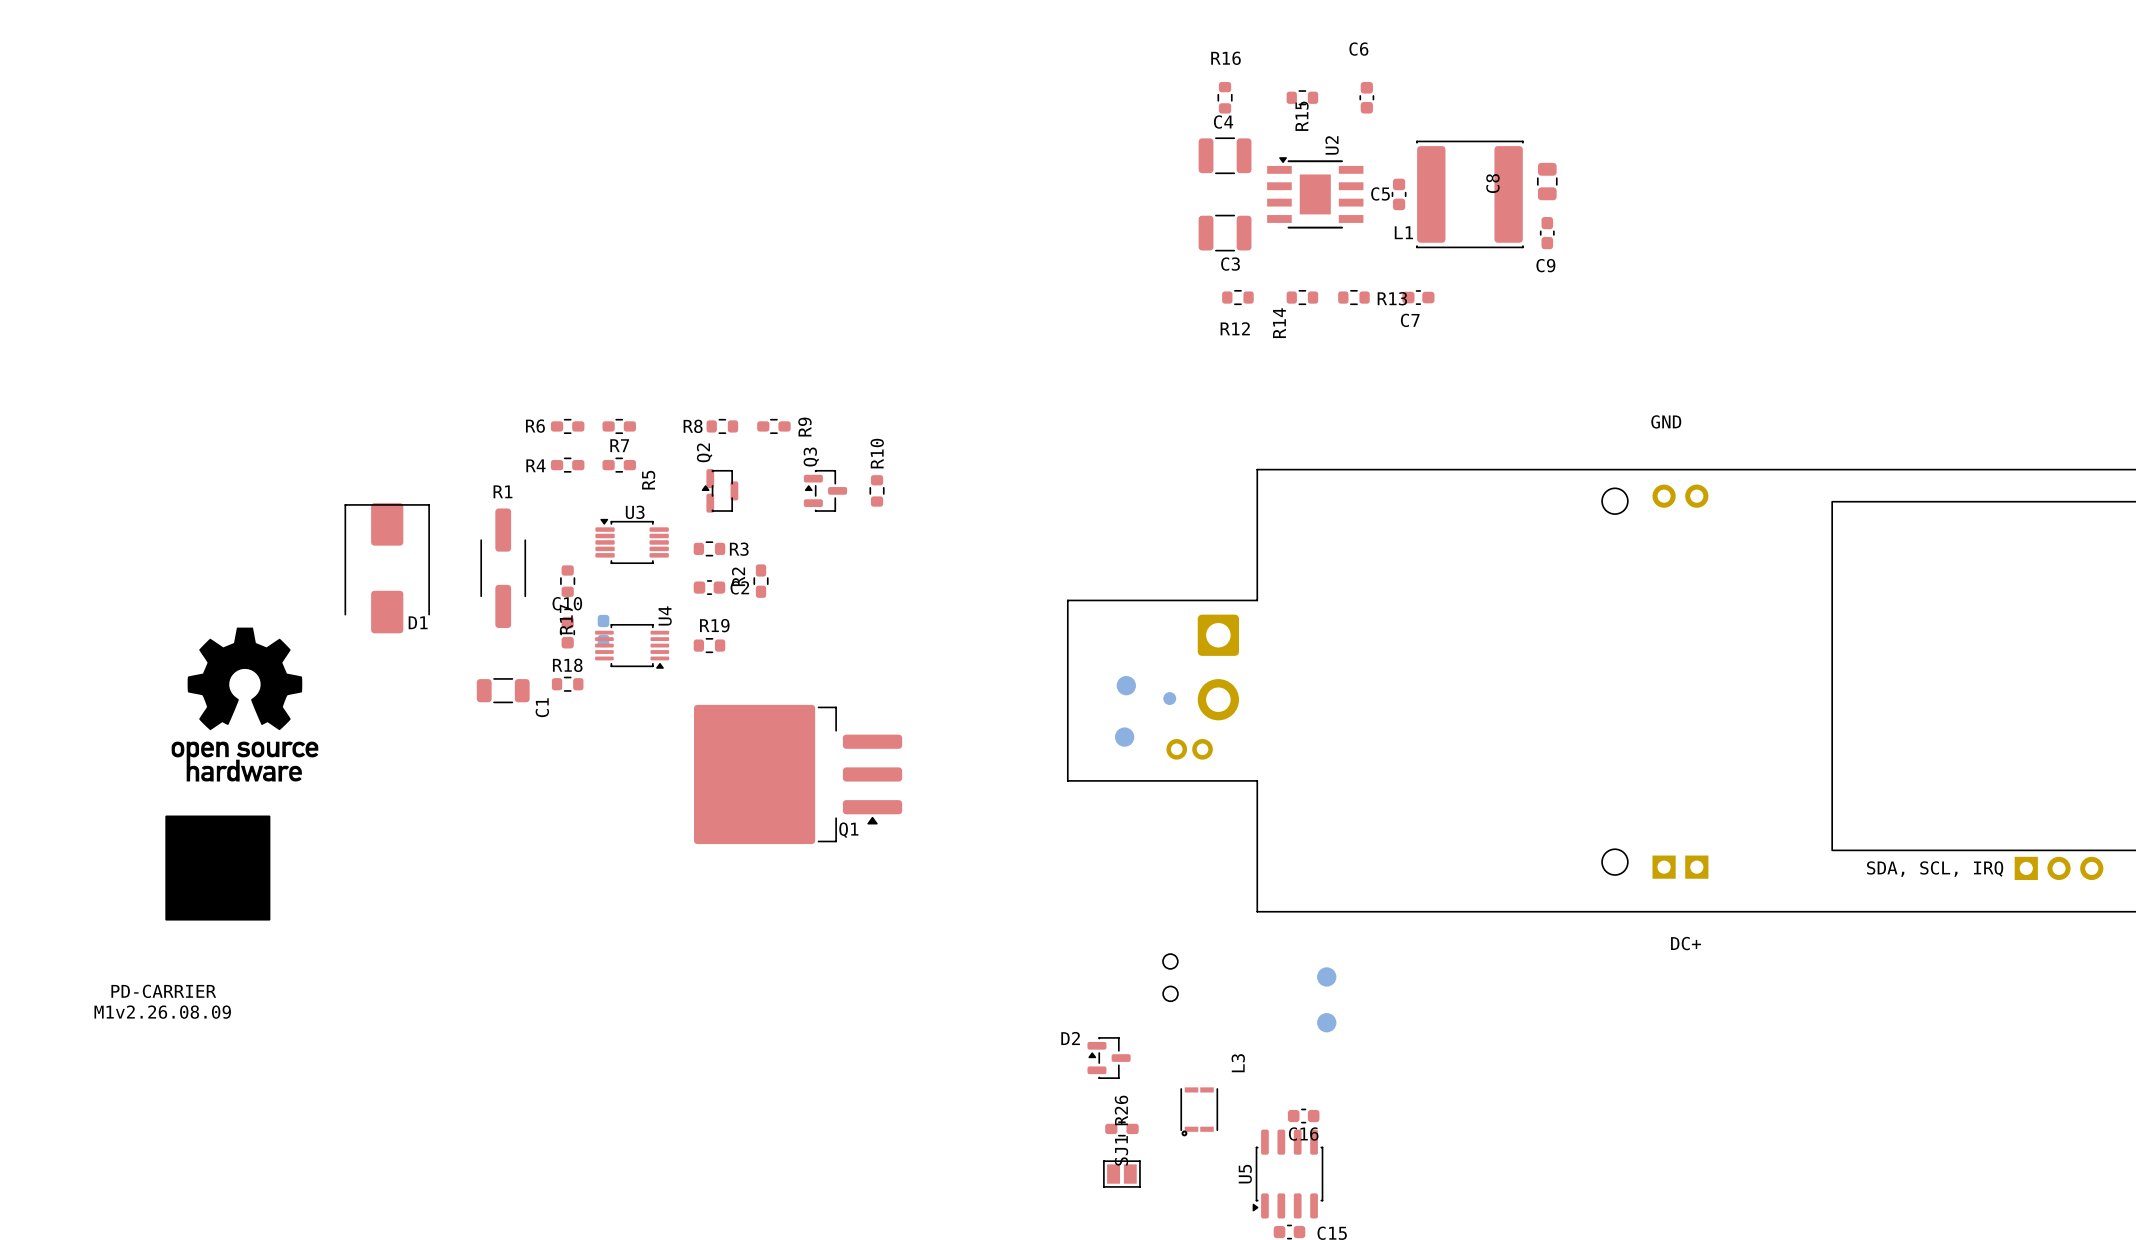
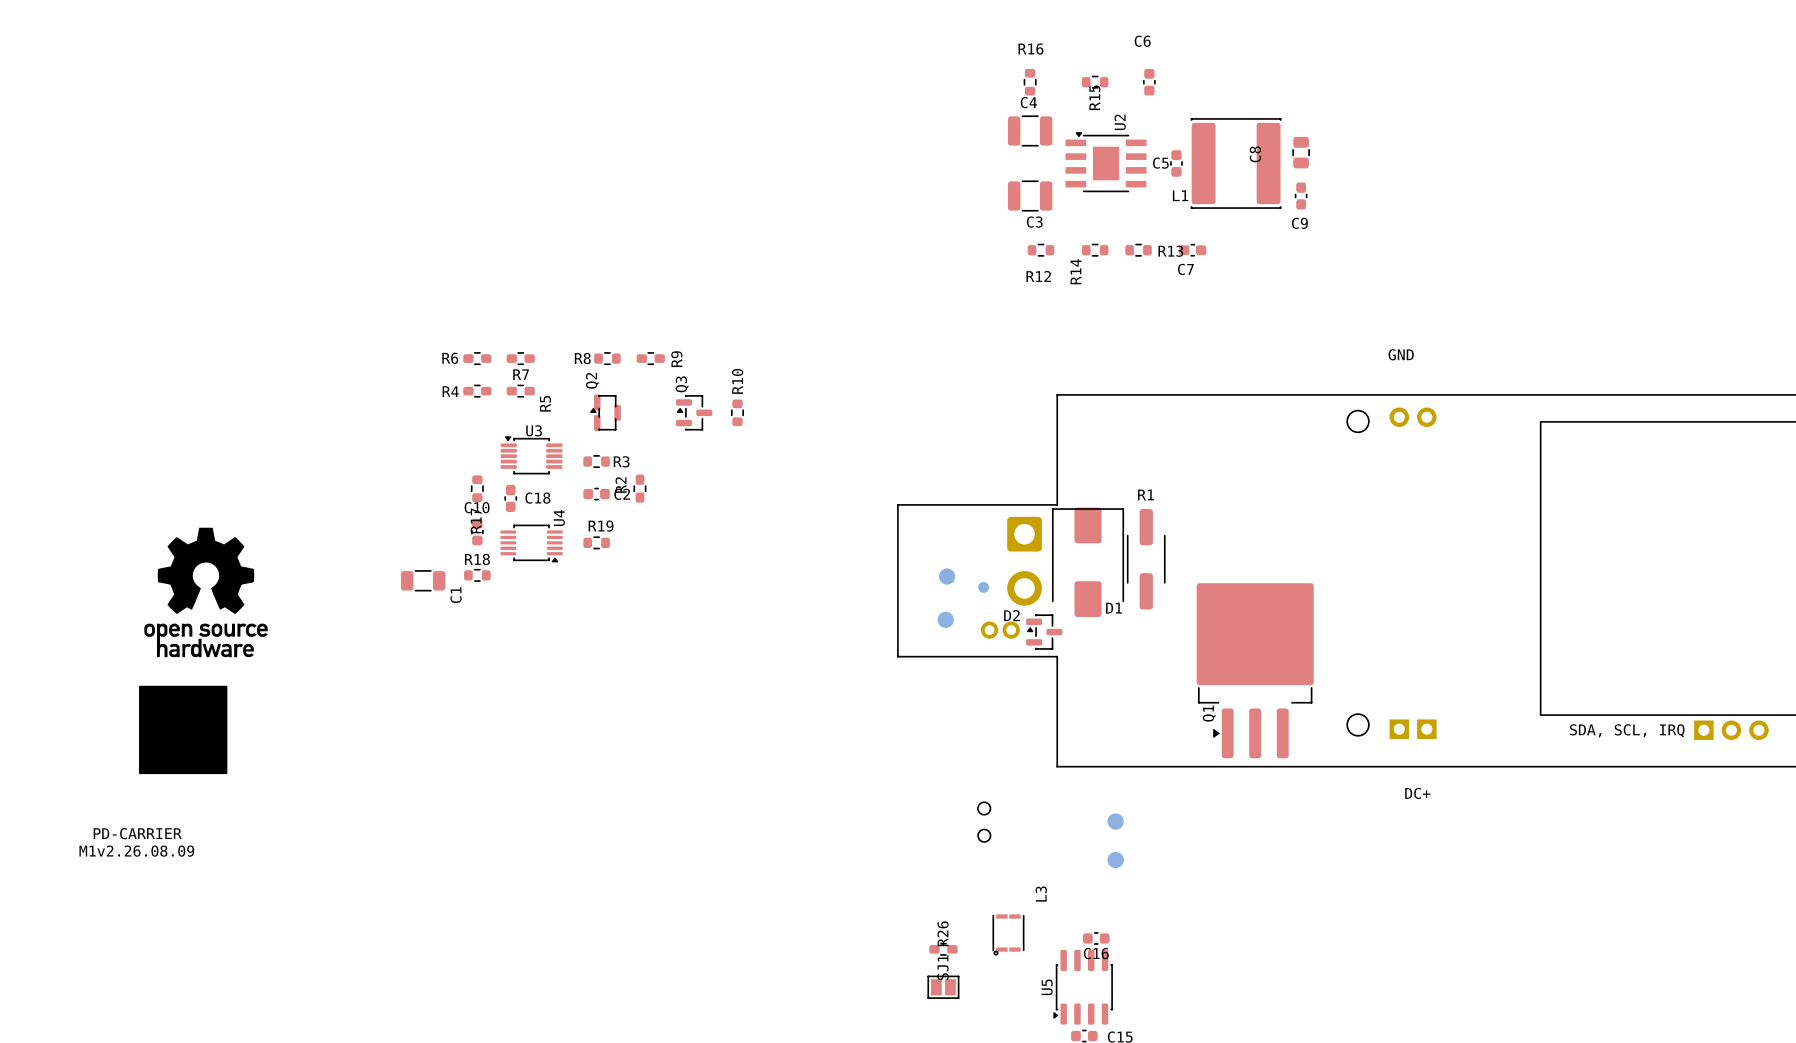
D1 position: (387, 568) -> (1088, 562)
R1 position: (503, 568) -> (1146, 559)
C18 side: bottom (603, 631) -> top (510, 498)
Q1 rotation: 0° (798, 774) -> 90° clockwise (1255, 670)
Q1 position: (798, 774) -> (1255, 670)
D2 position: (1109, 1058) -> (1044, 632)

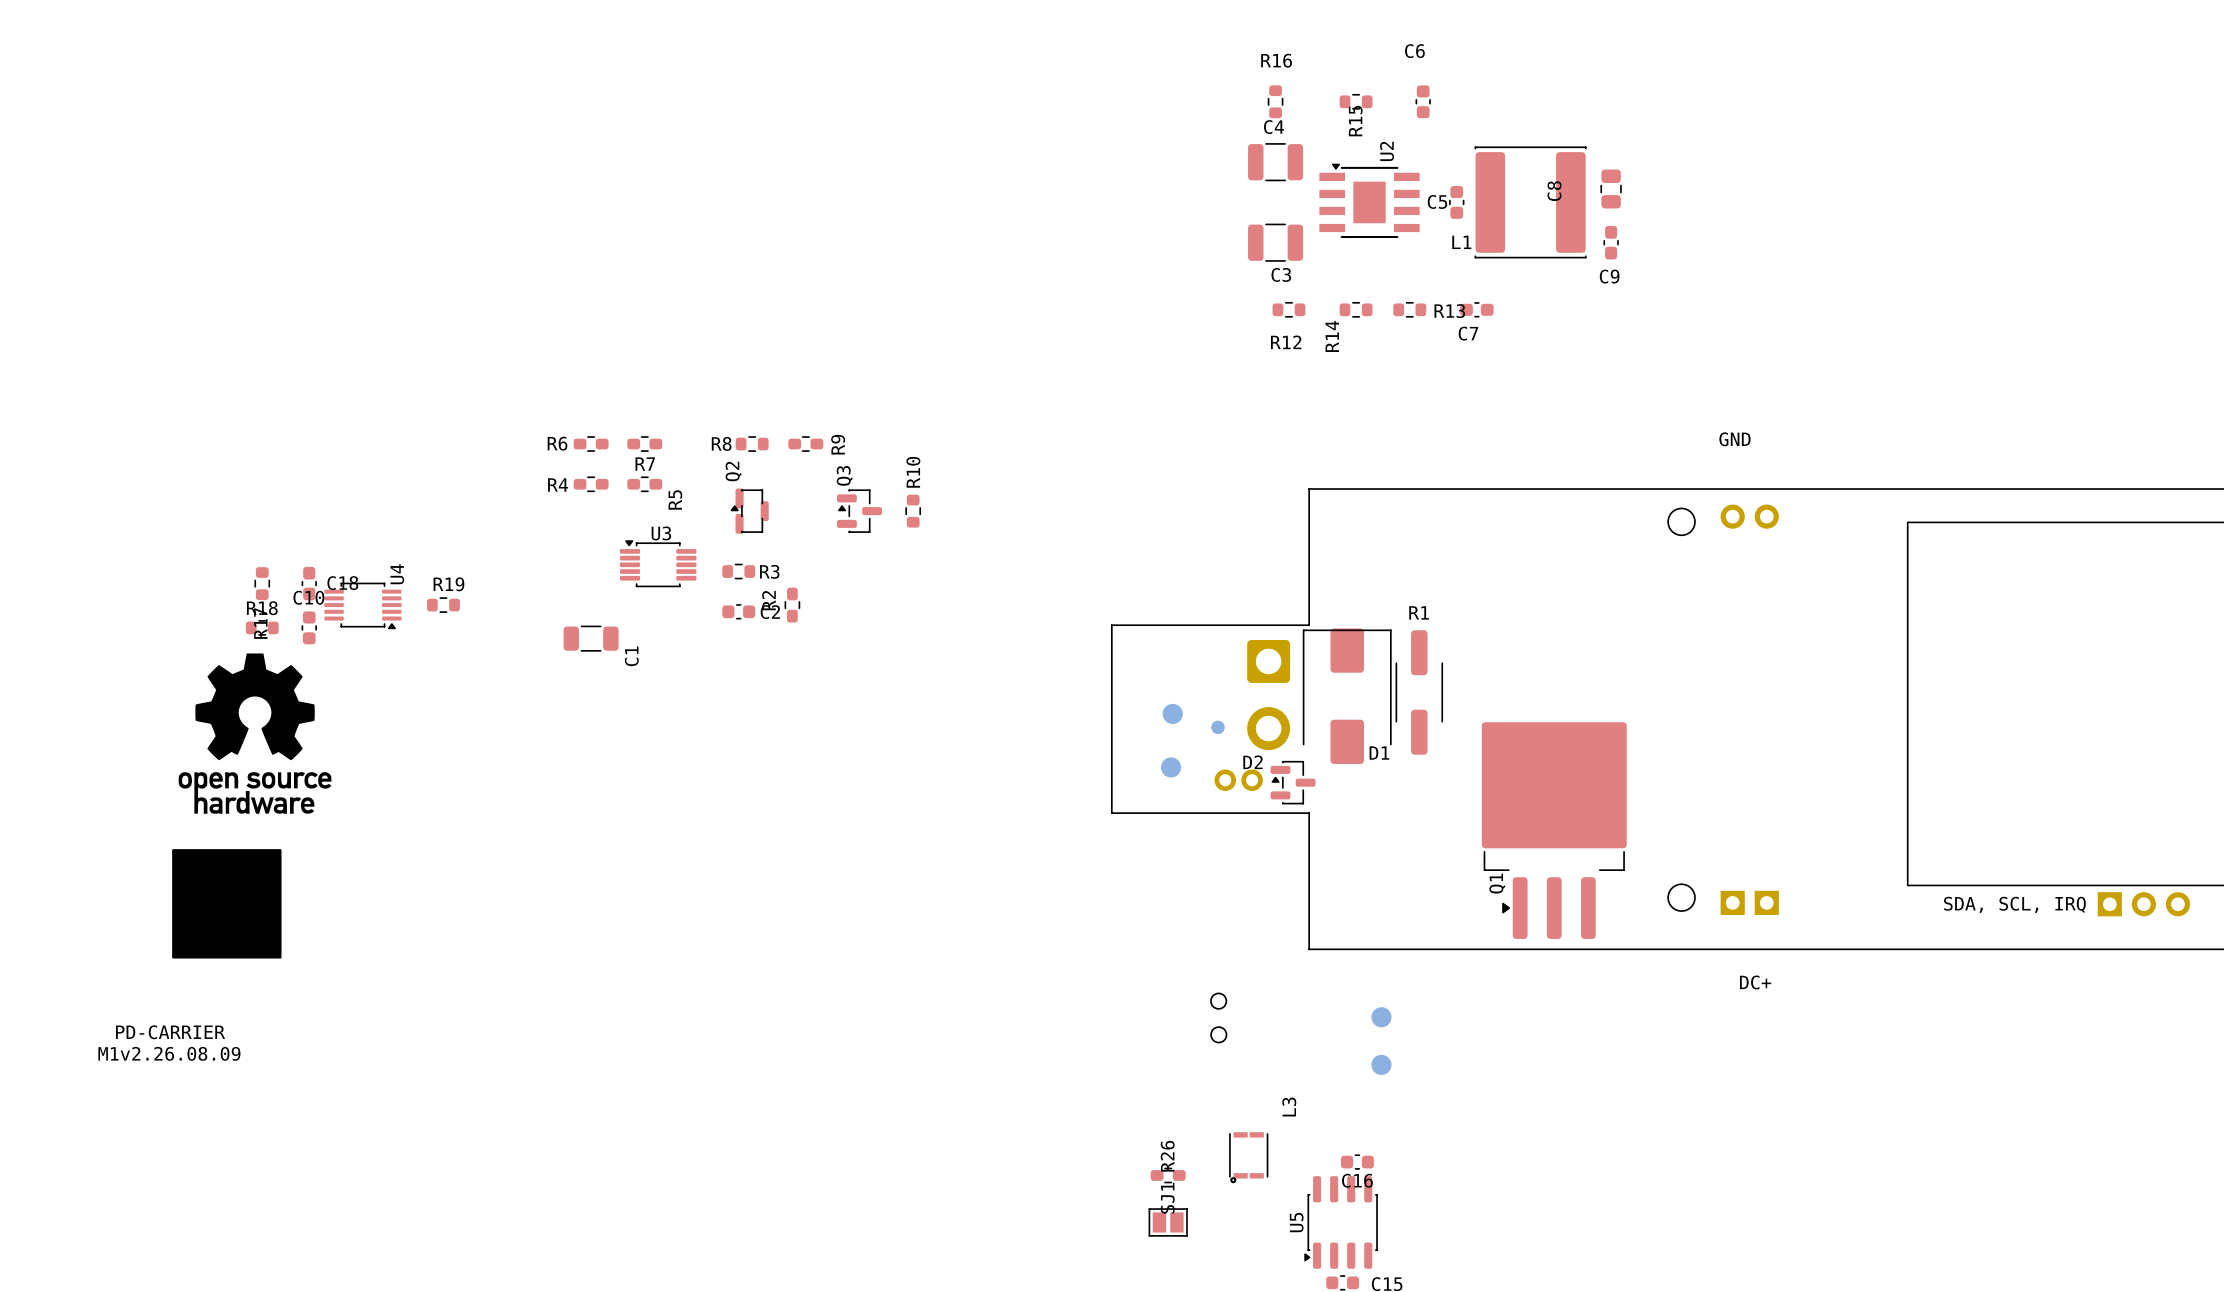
R17 position: (477, 488) -> (262, 583)
C18 position: (510, 498) -> (309, 583)
C10 position: (477, 532) -> (309, 627)
R19 position: (596, 542) -> (443, 605)
U4 position: (531, 543) -> (362, 605)
R18 position: (477, 575) -> (262, 627)
C1 position: (423, 580) -> (591, 638)

